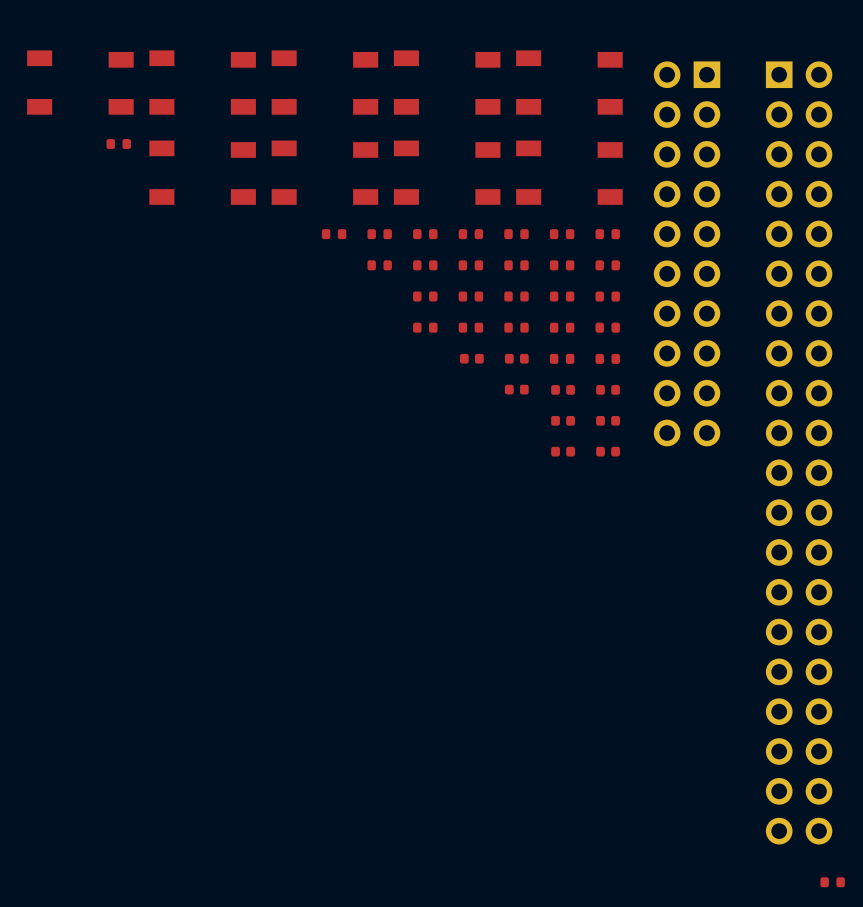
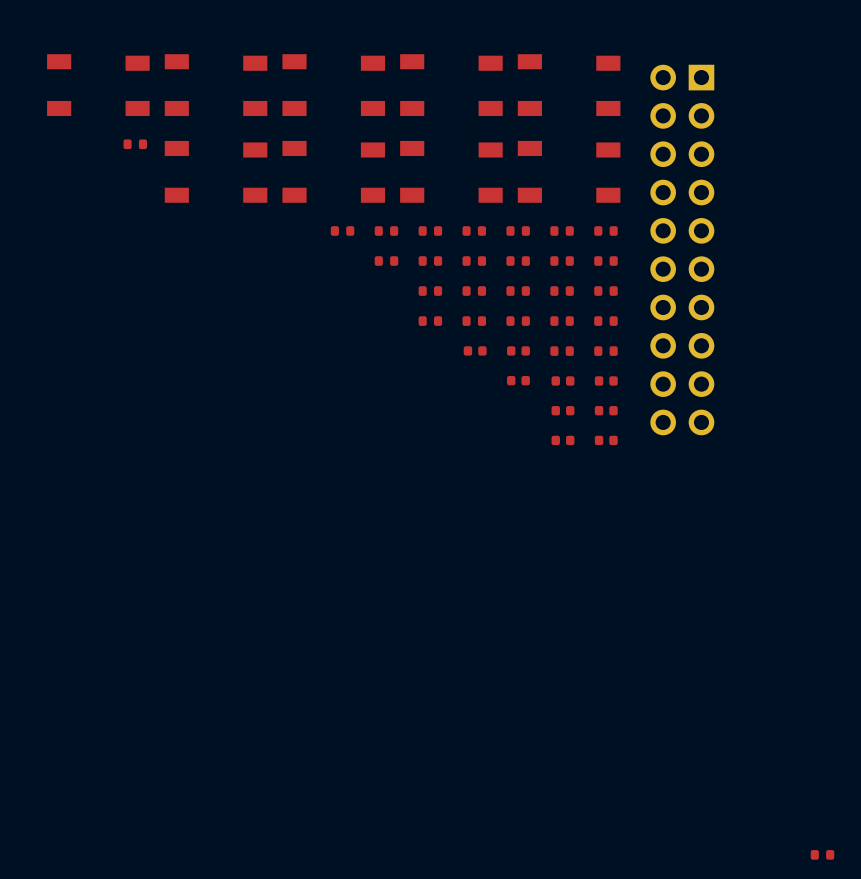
part: (799, 452) -> none

